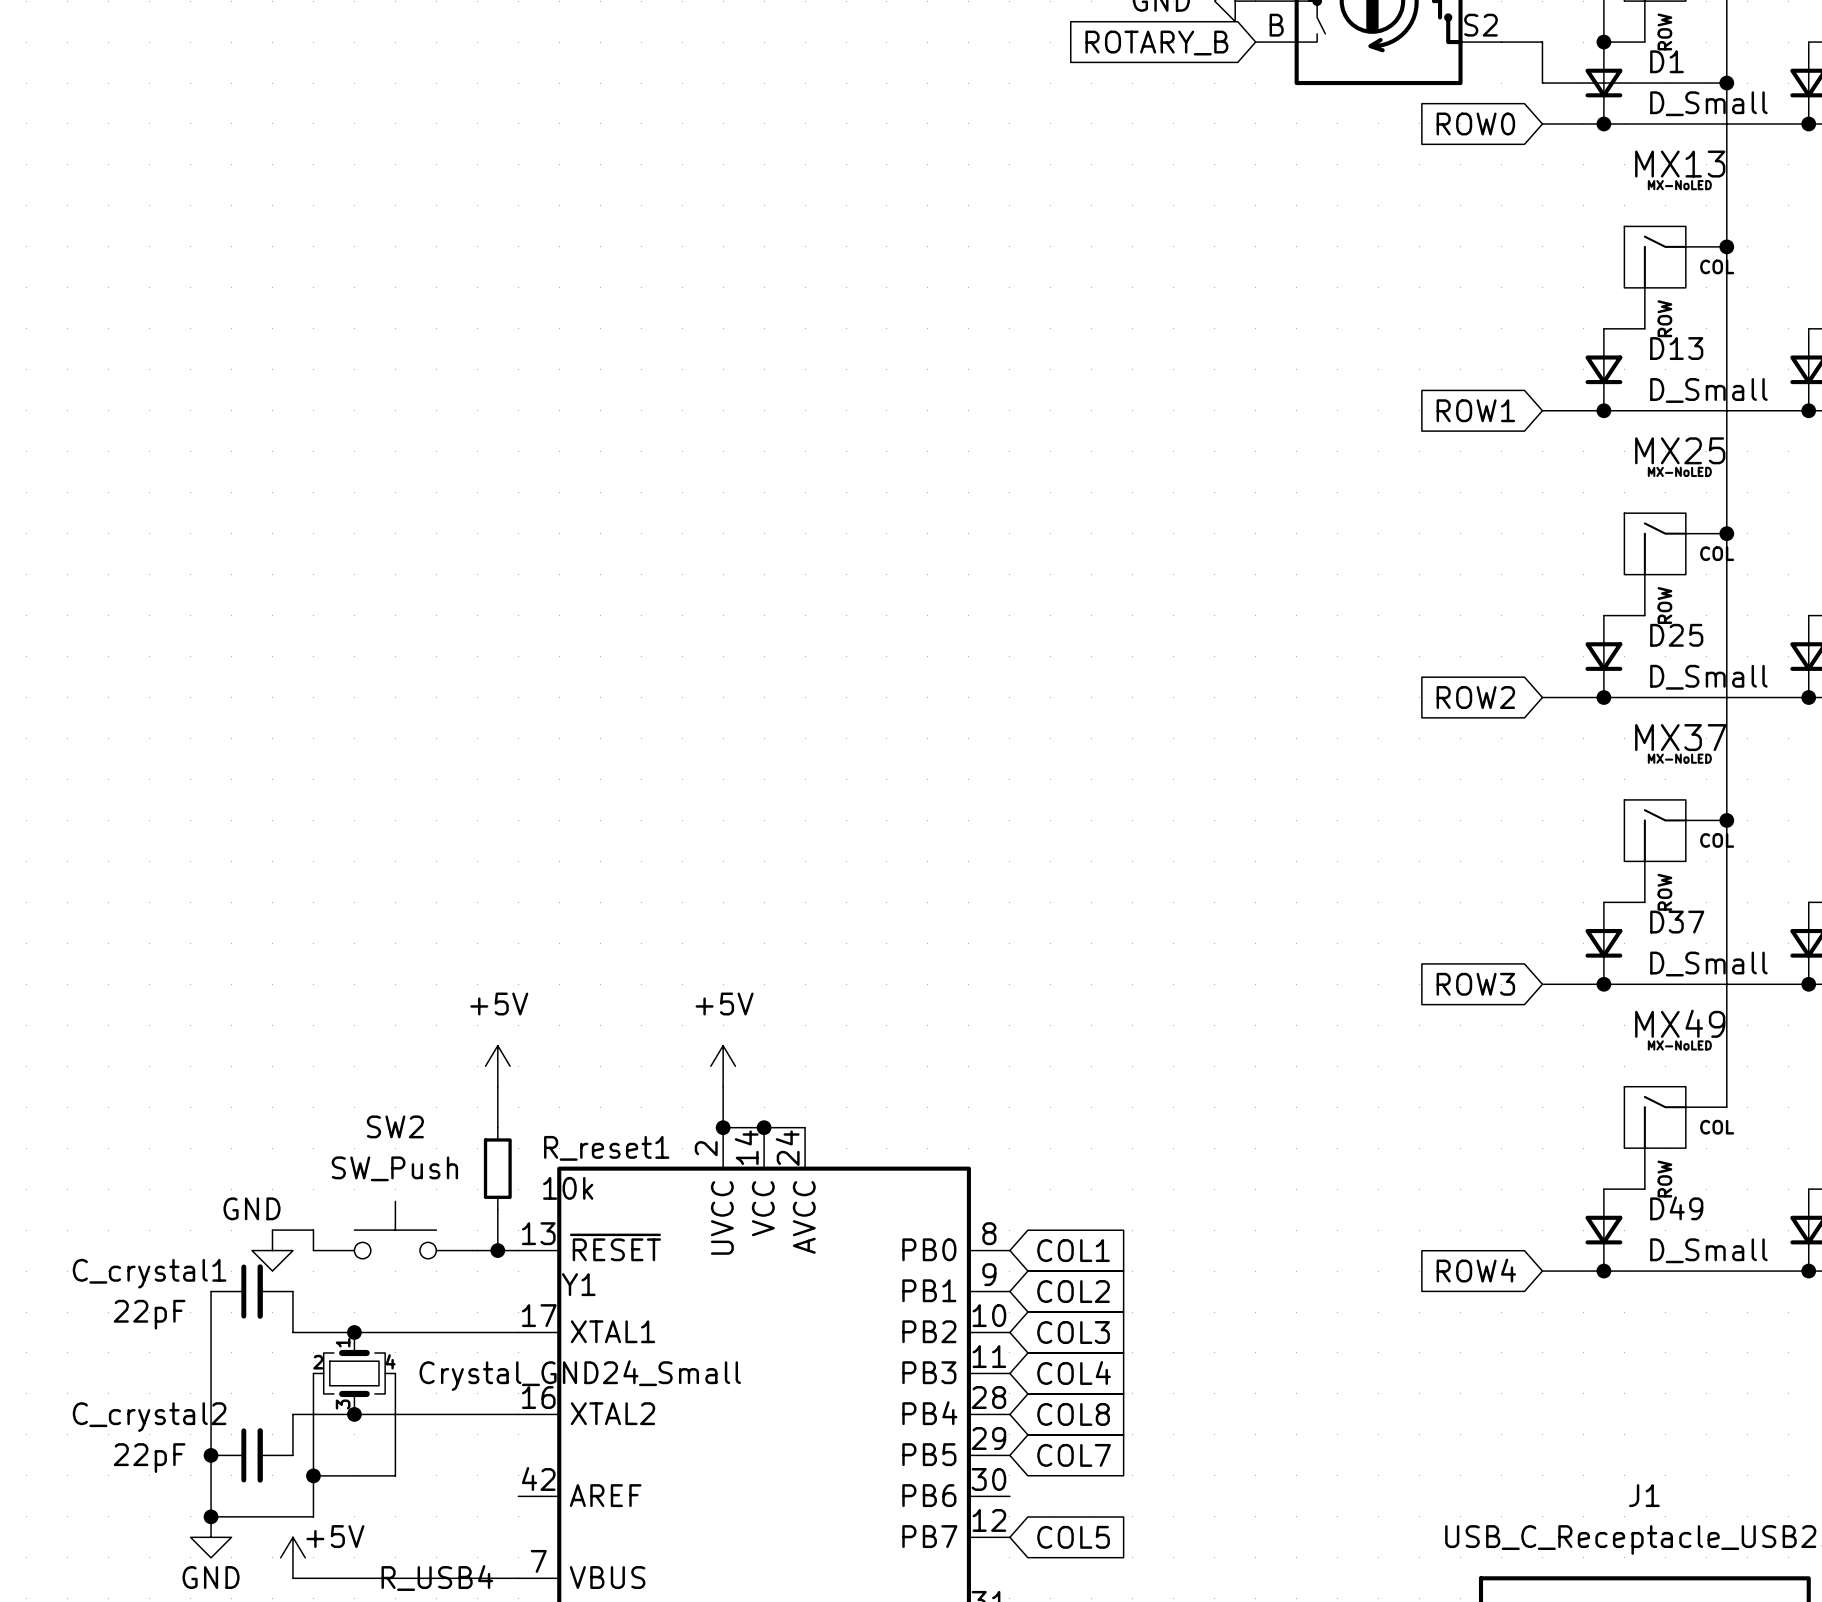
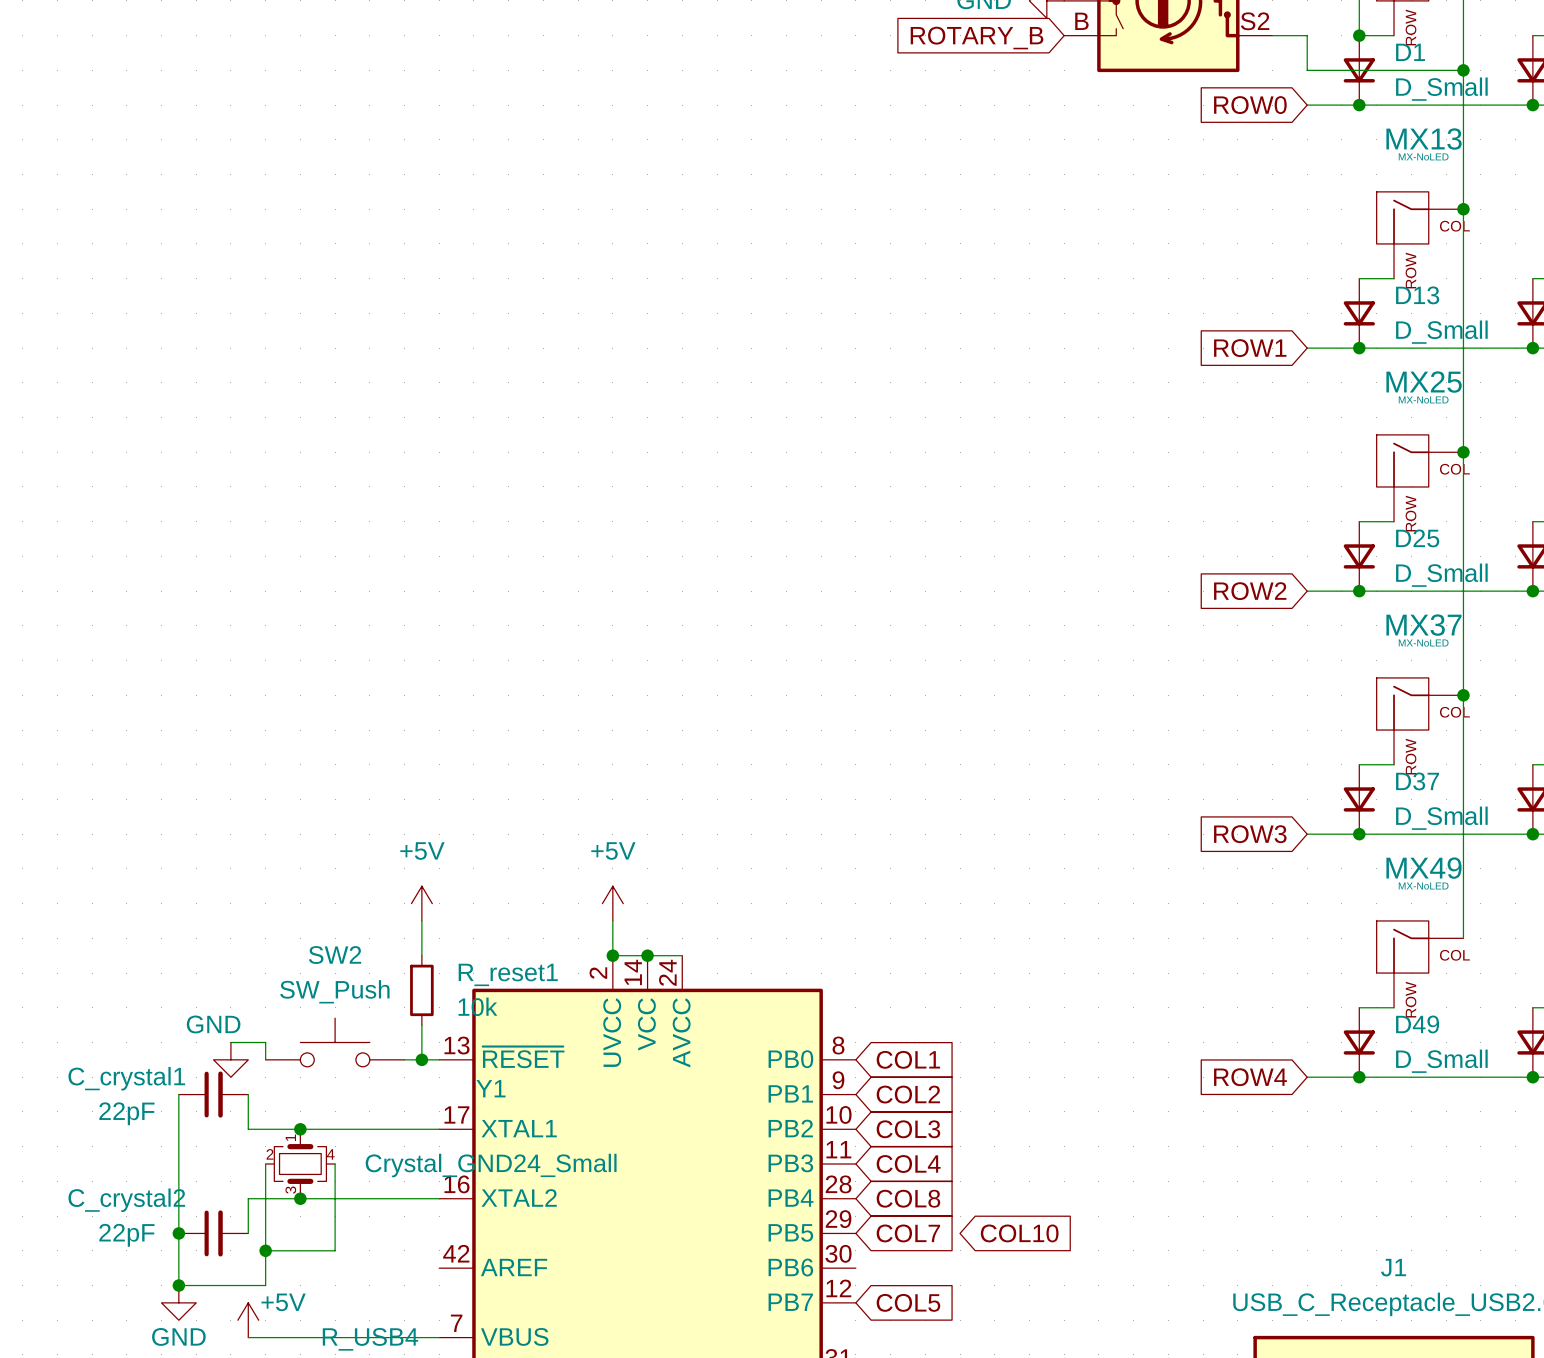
global label: none -> COL10 (1019, 1233)

